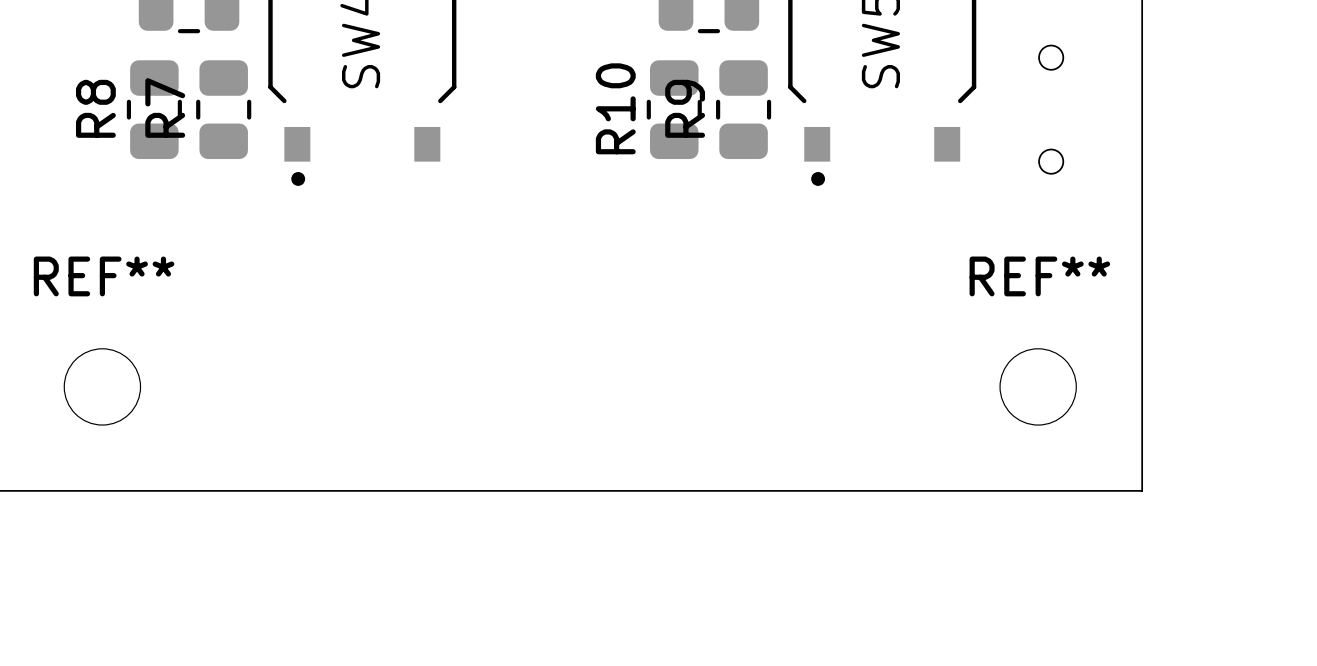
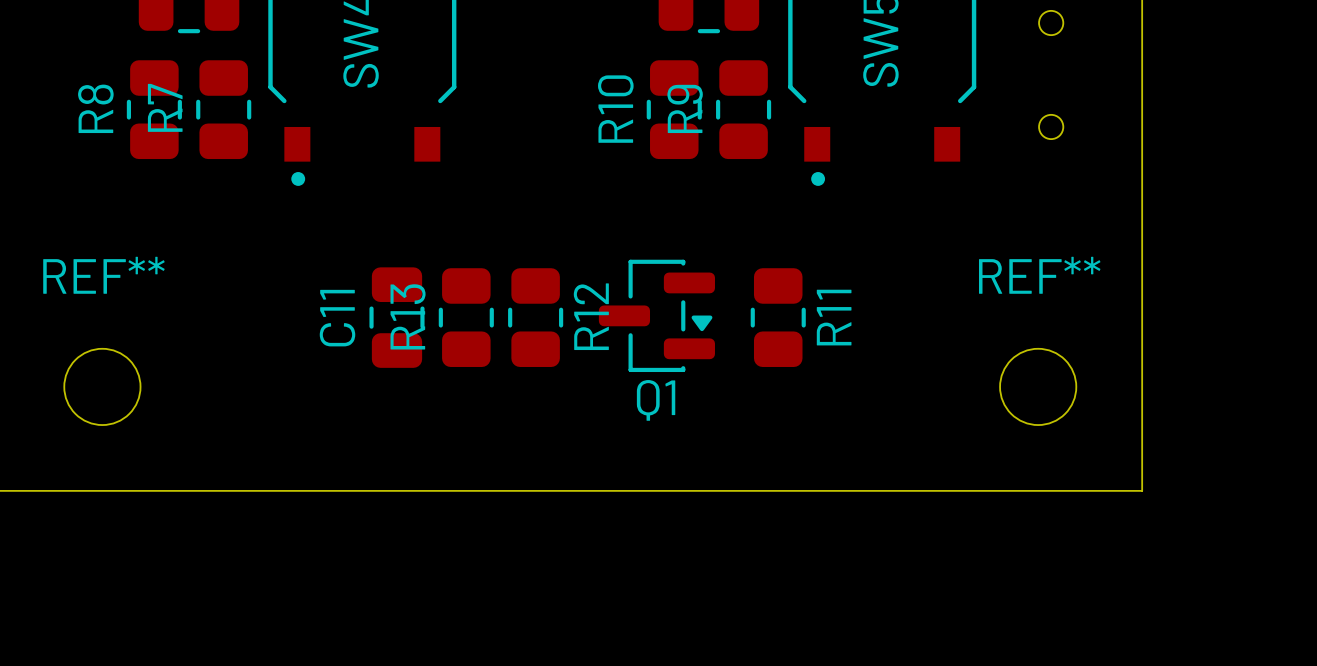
part position: (1051, 109) -> (1051, 74)
Q1: none -> (656, 315)
C11: none -> (397, 317)
R13: none -> (466, 317)
R12: none -> (535, 317)
R11: none -> (778, 317)

